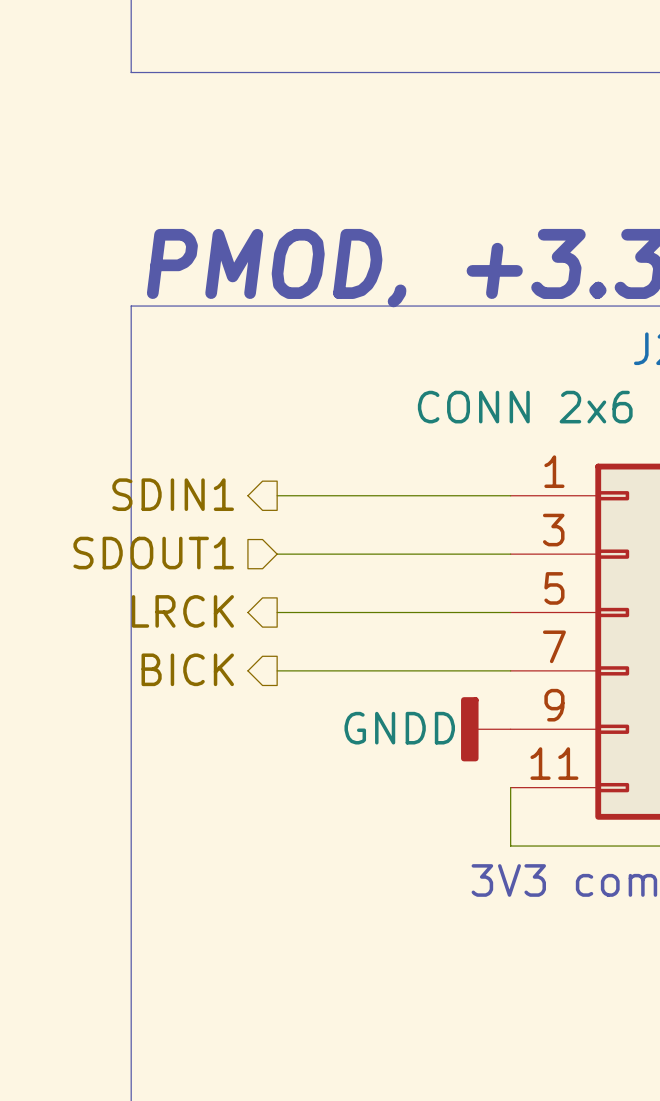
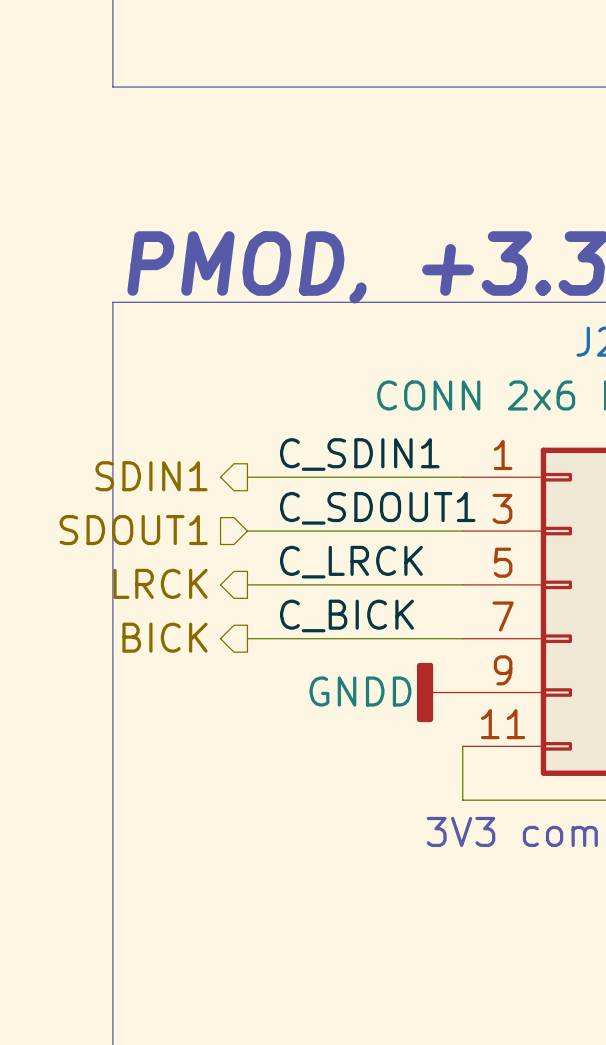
label: none -> C_SDIN1 (359, 454)
label: none -> C_SDOUT1 (377, 508)
label: none -> C_LRCK (351, 562)
label: none -> C_BICK (346, 615)

